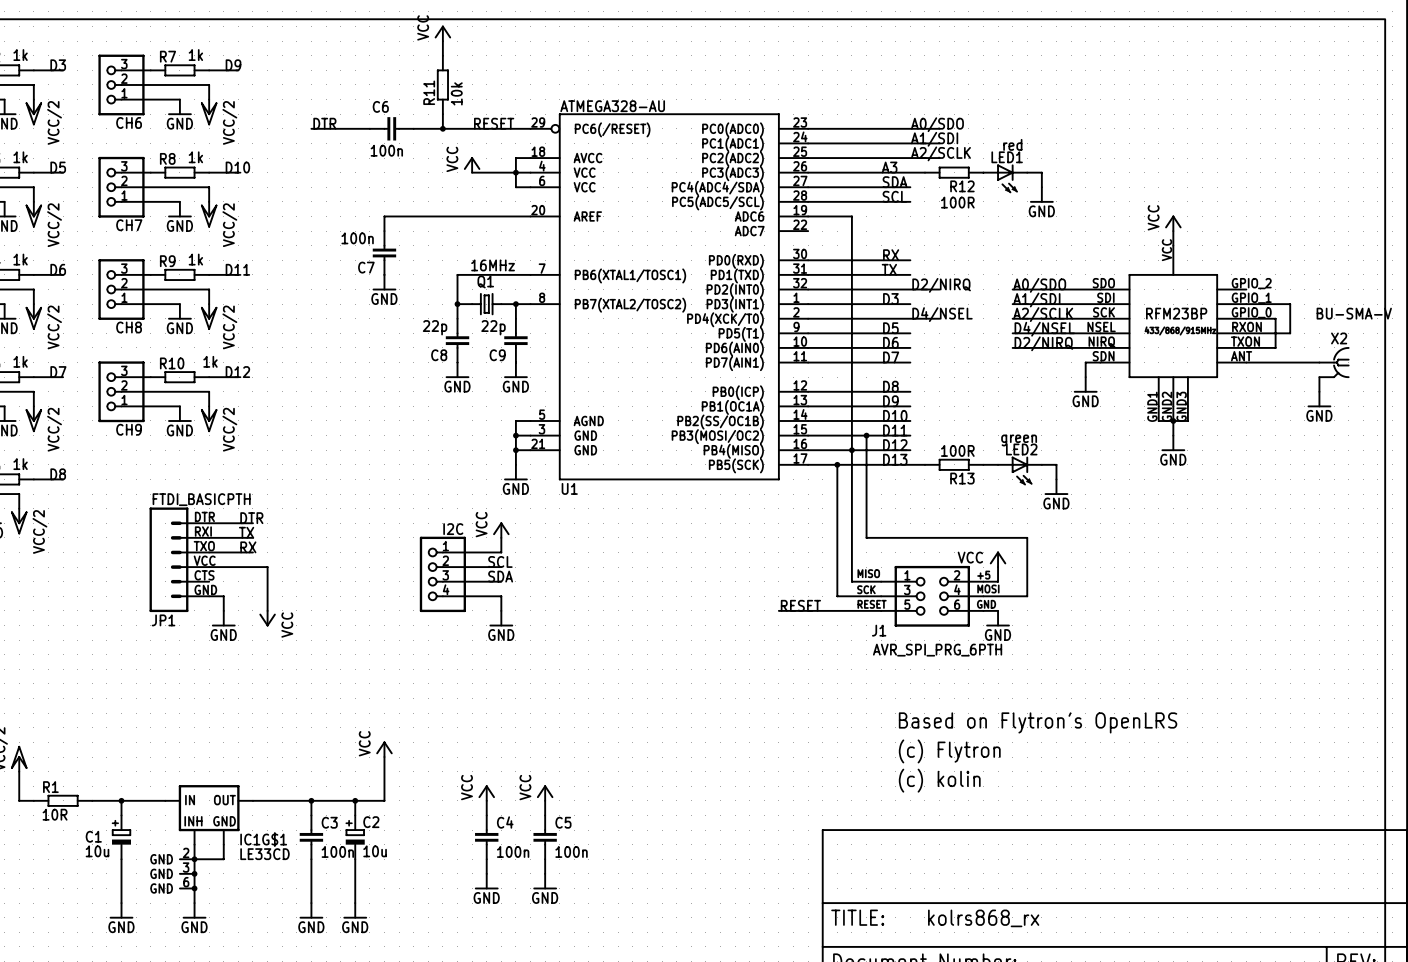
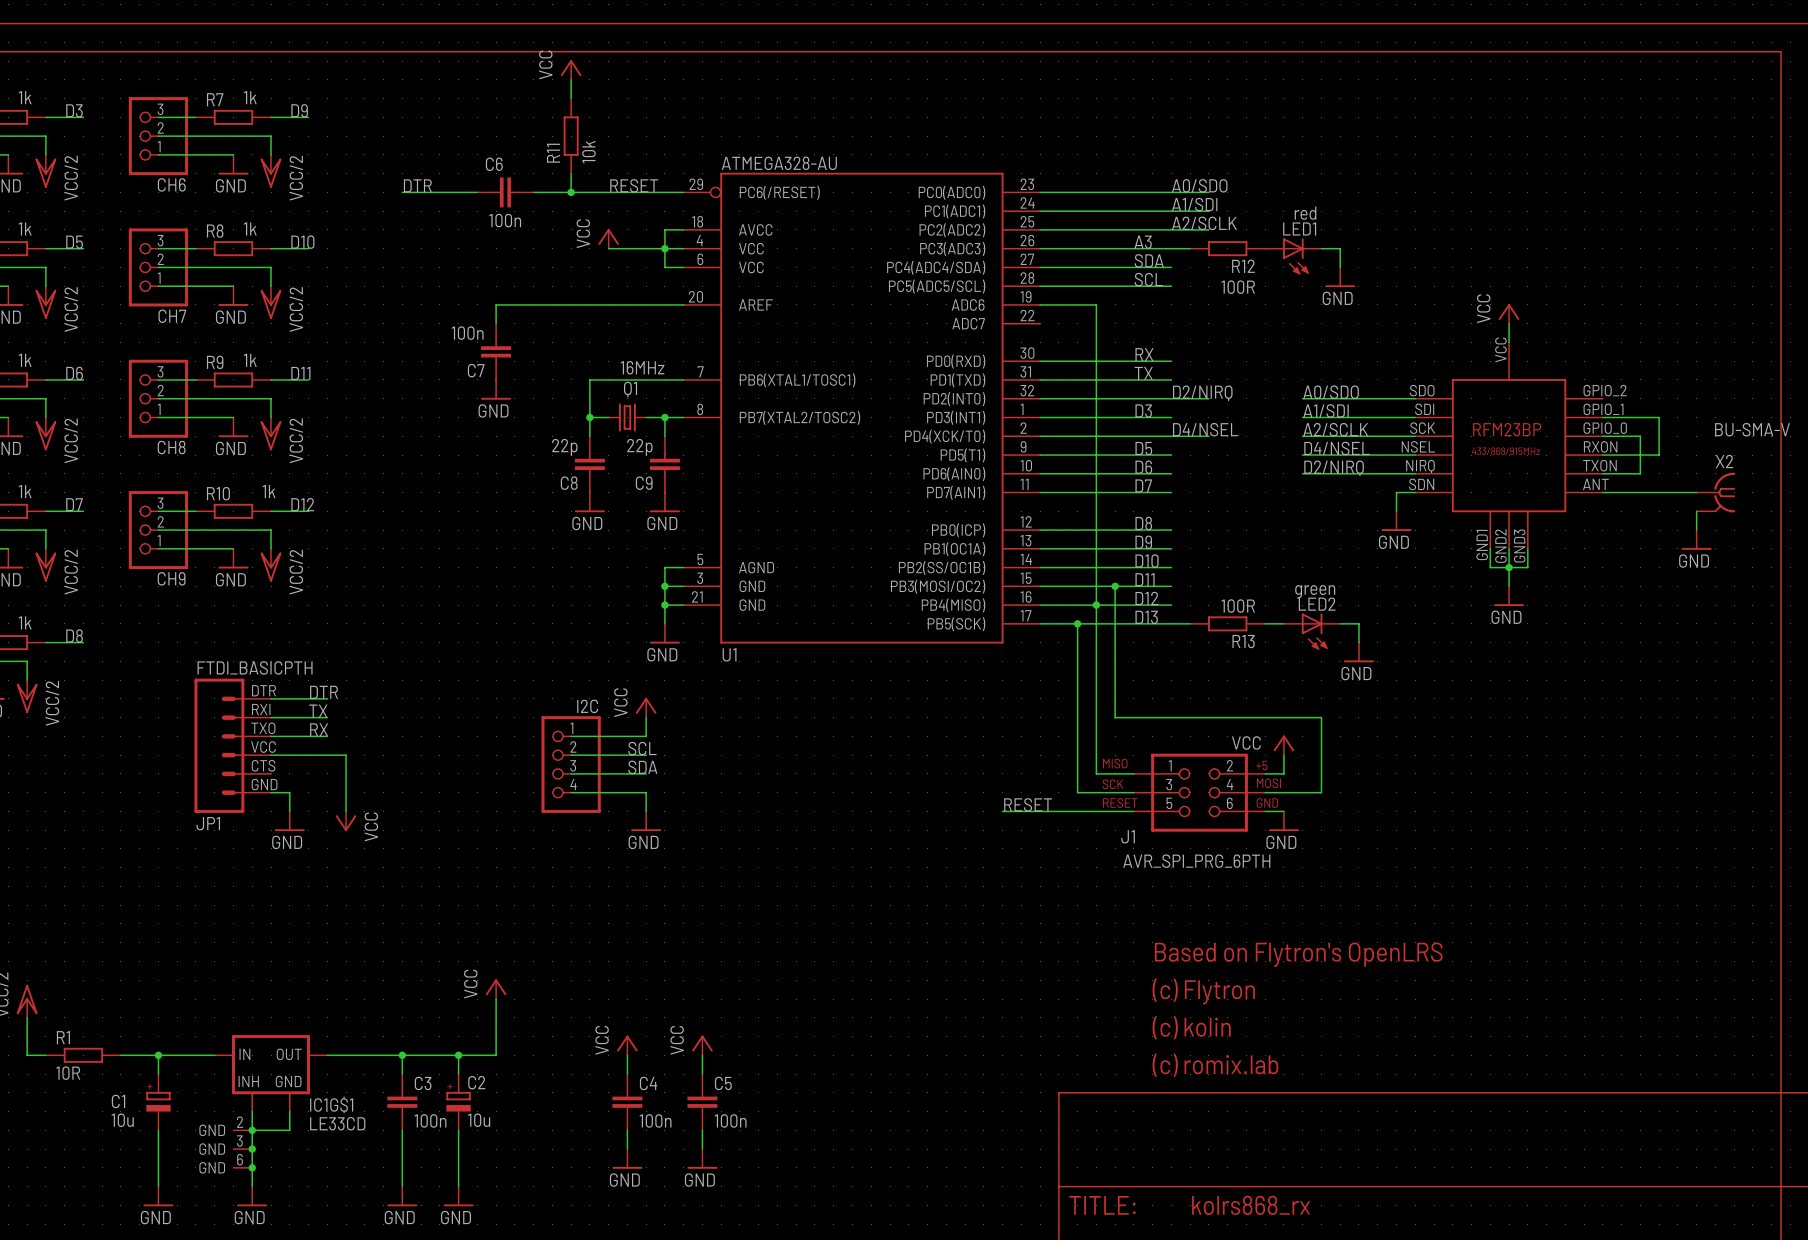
text: none -> (c) romix.lab (1215, 1065)

